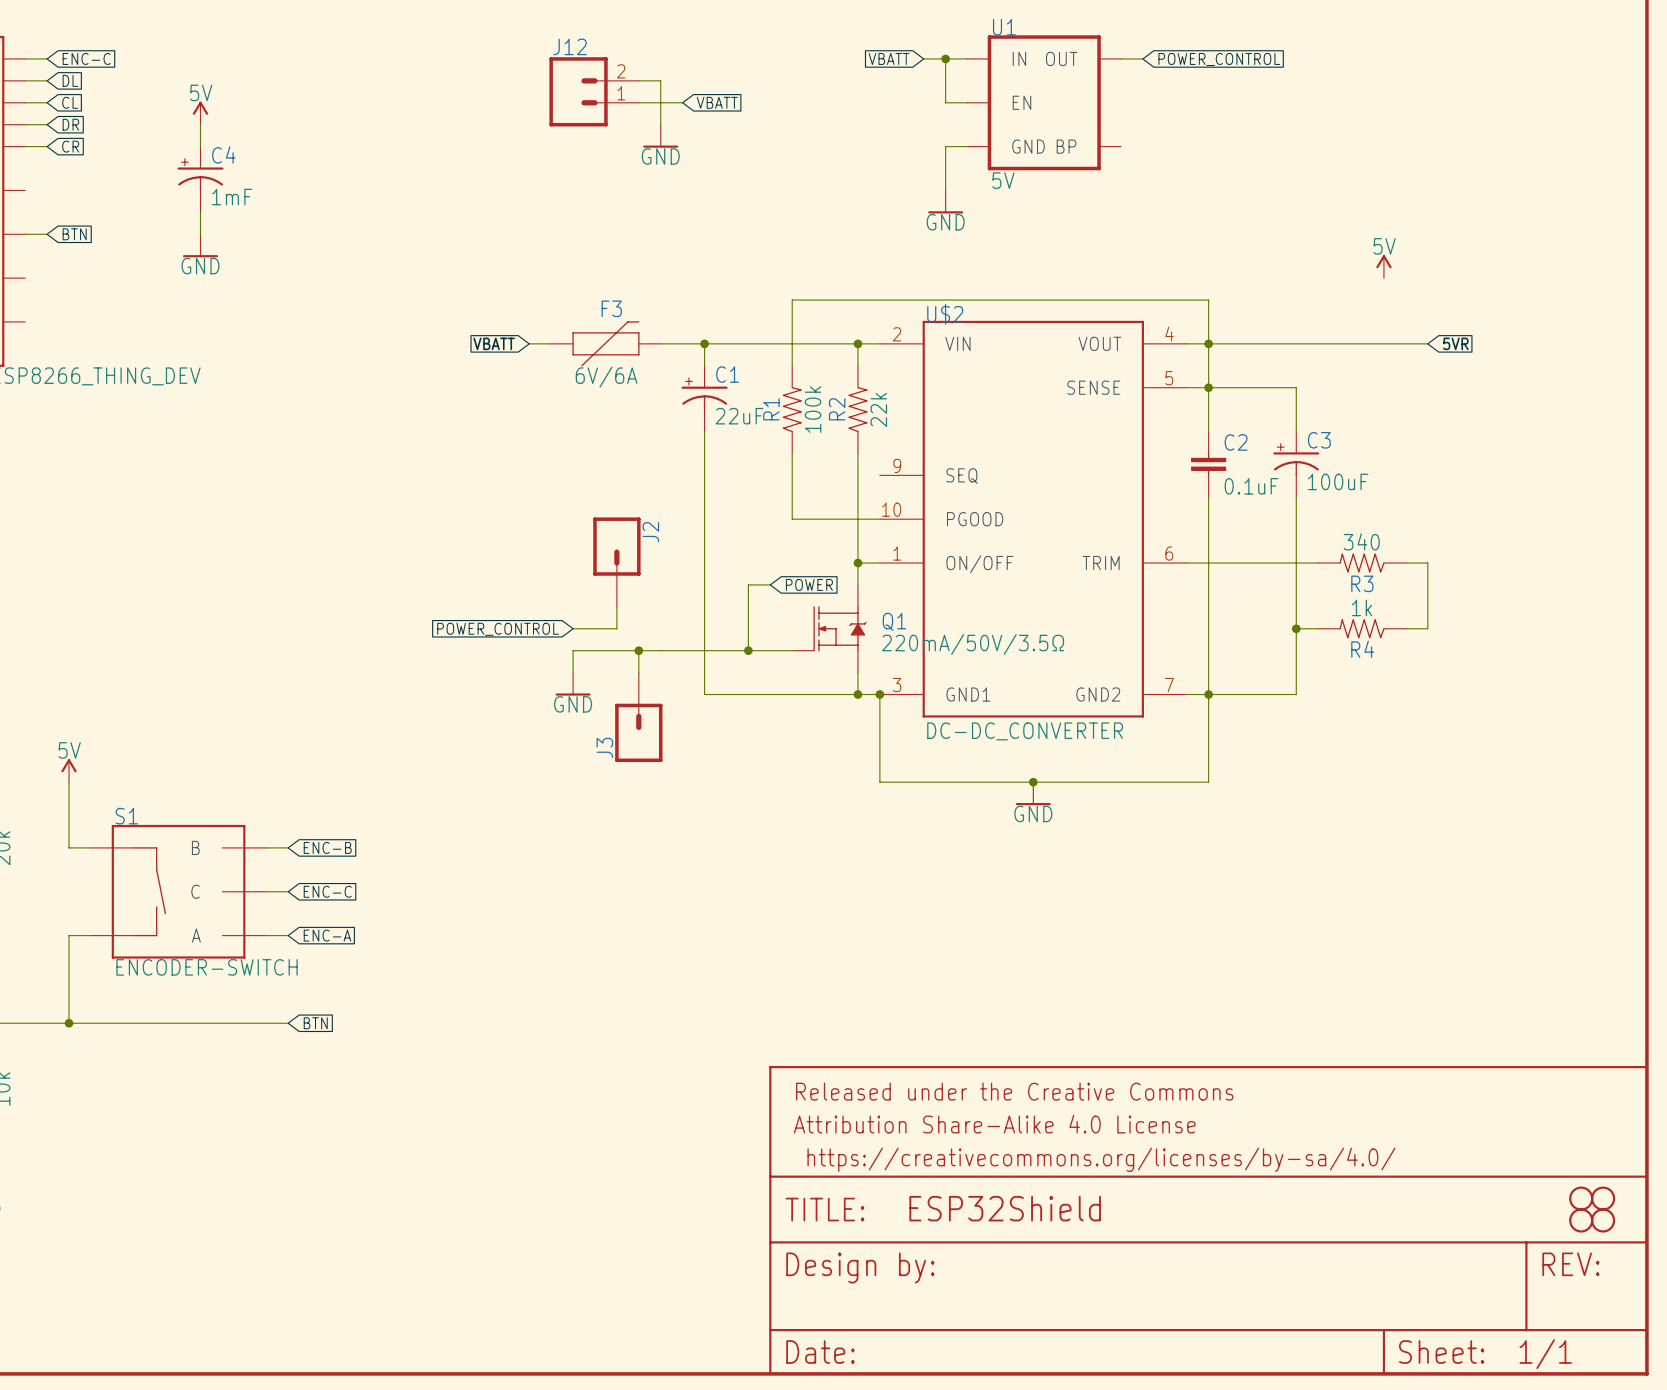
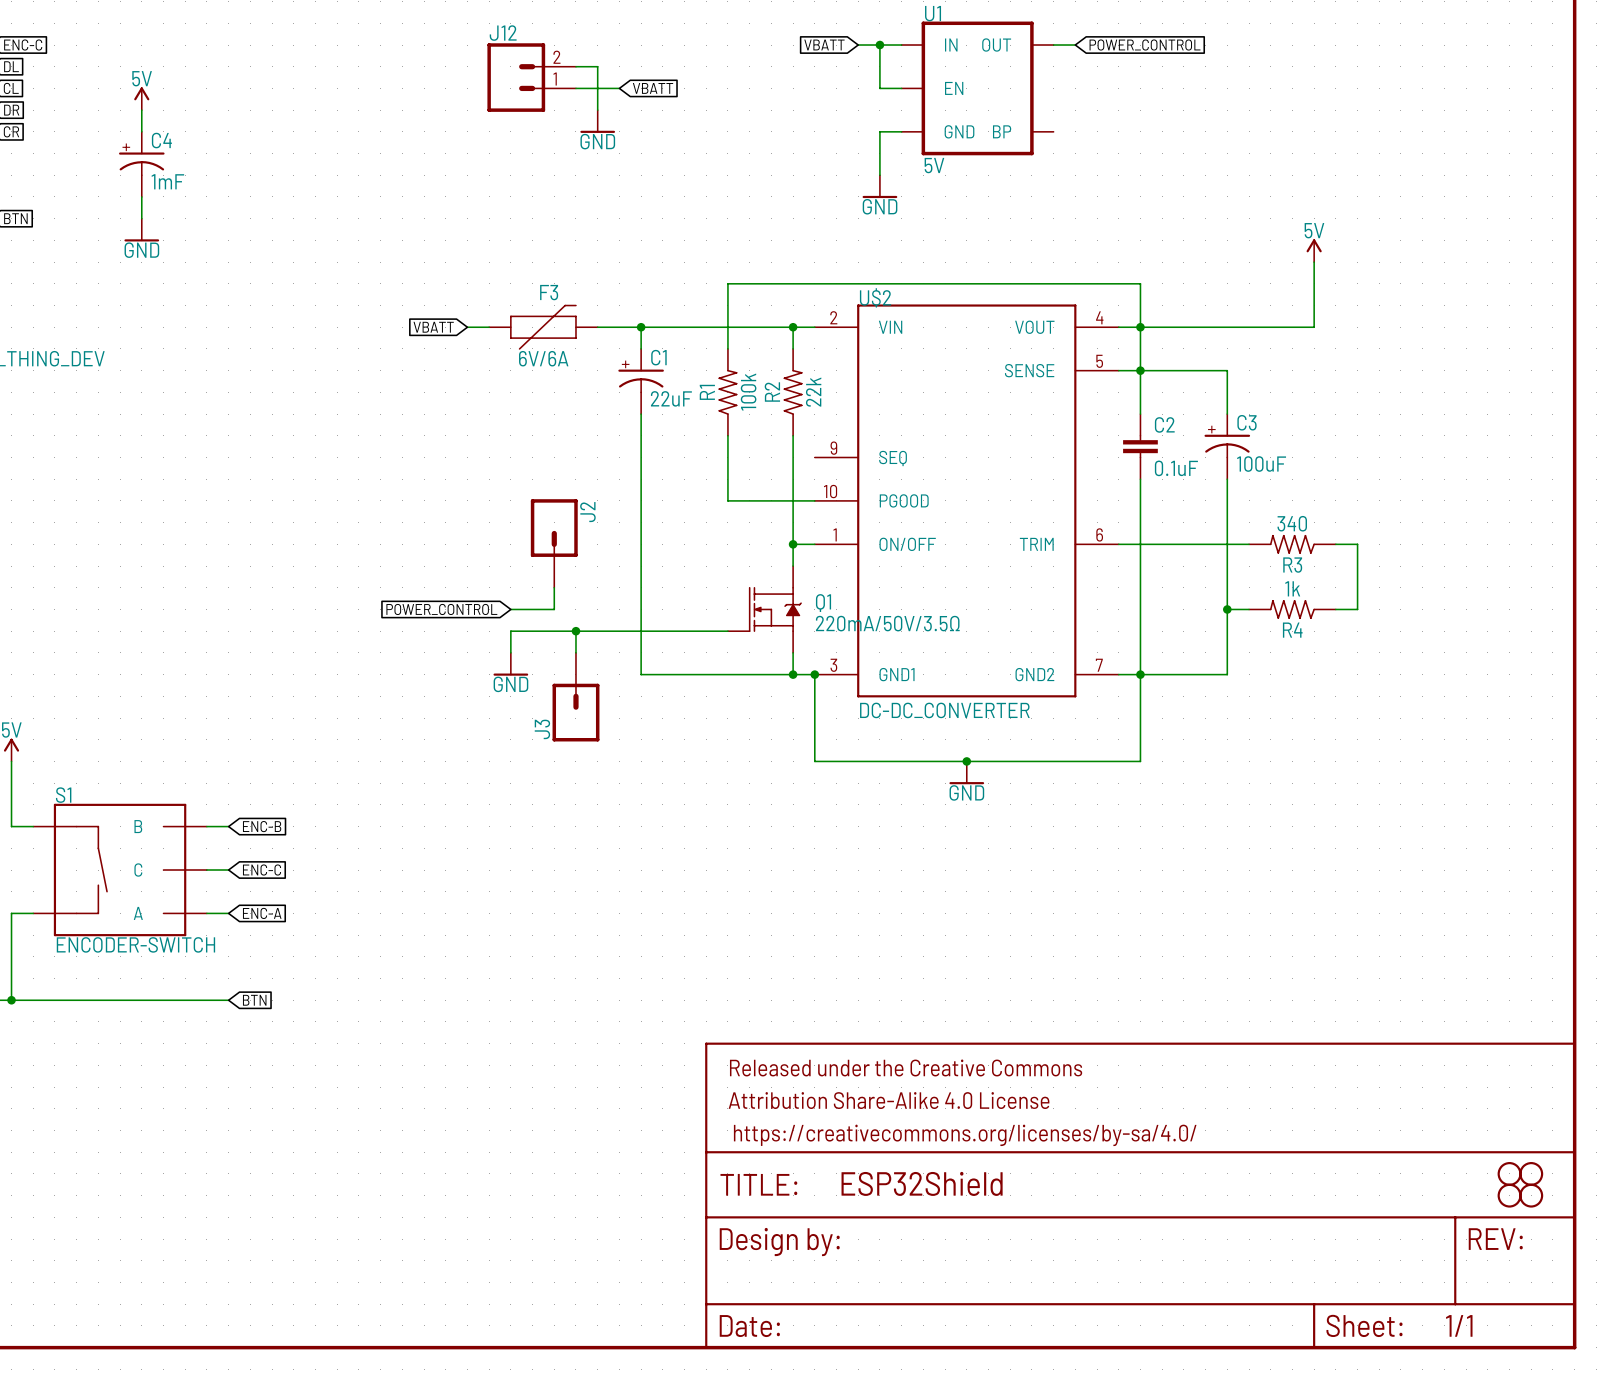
wire: (1383, 343) (1427, 343) -> (1314, 327) (1314, 262)
global label: 5VR (1455, 343) -> none
wire: (770, 584) (748, 584) (748, 650) -> none
global label: POWER (809, 584) -> none
junction: (748, 650) -> none

